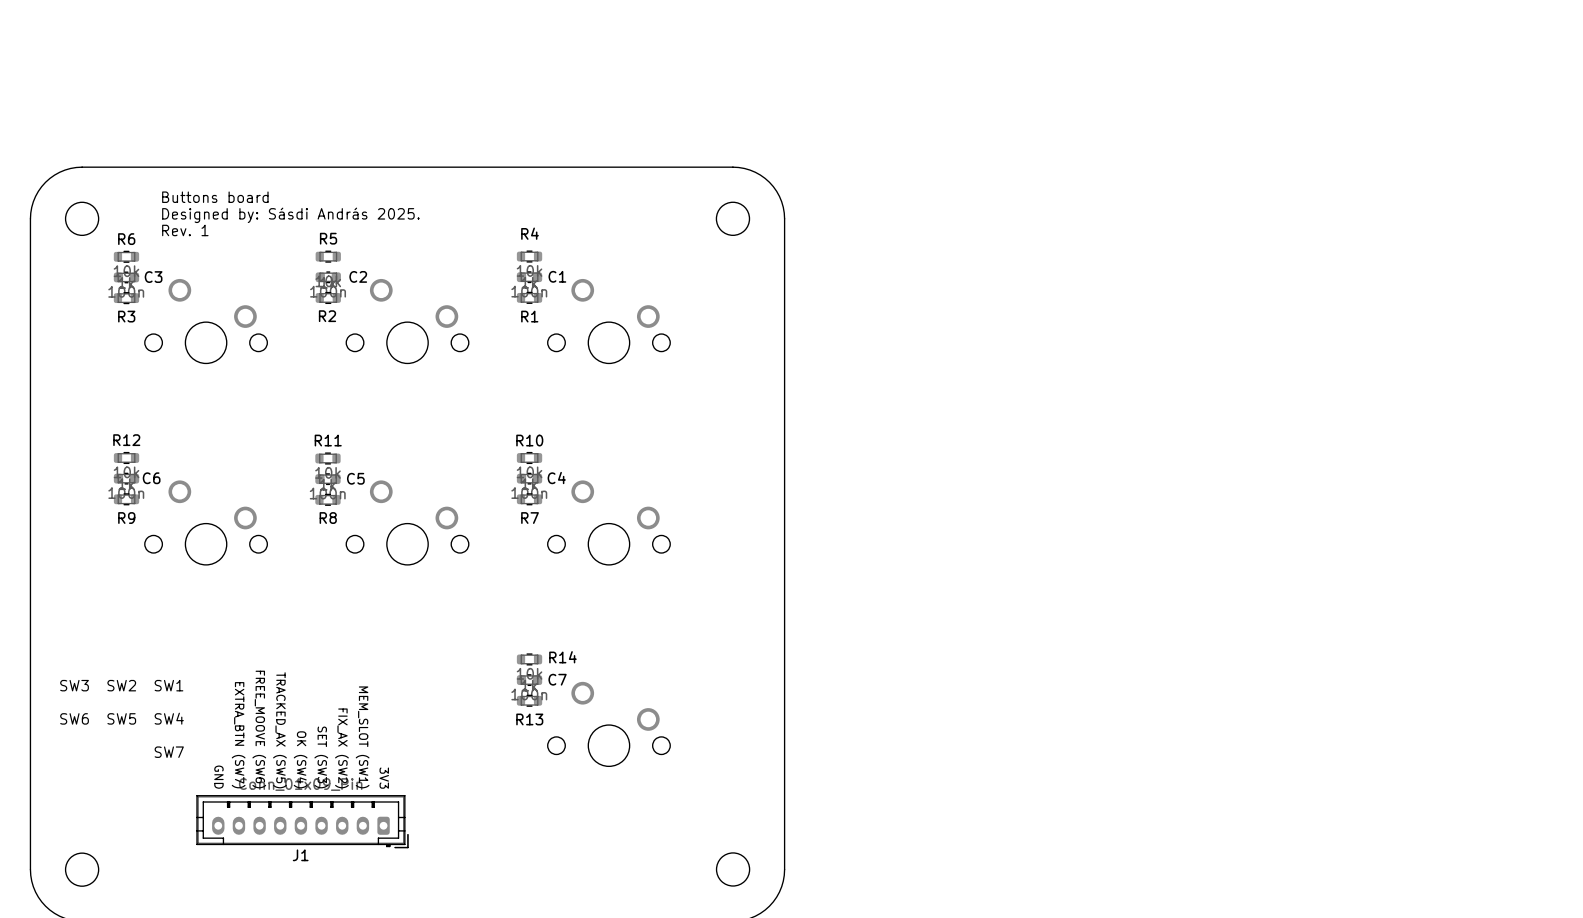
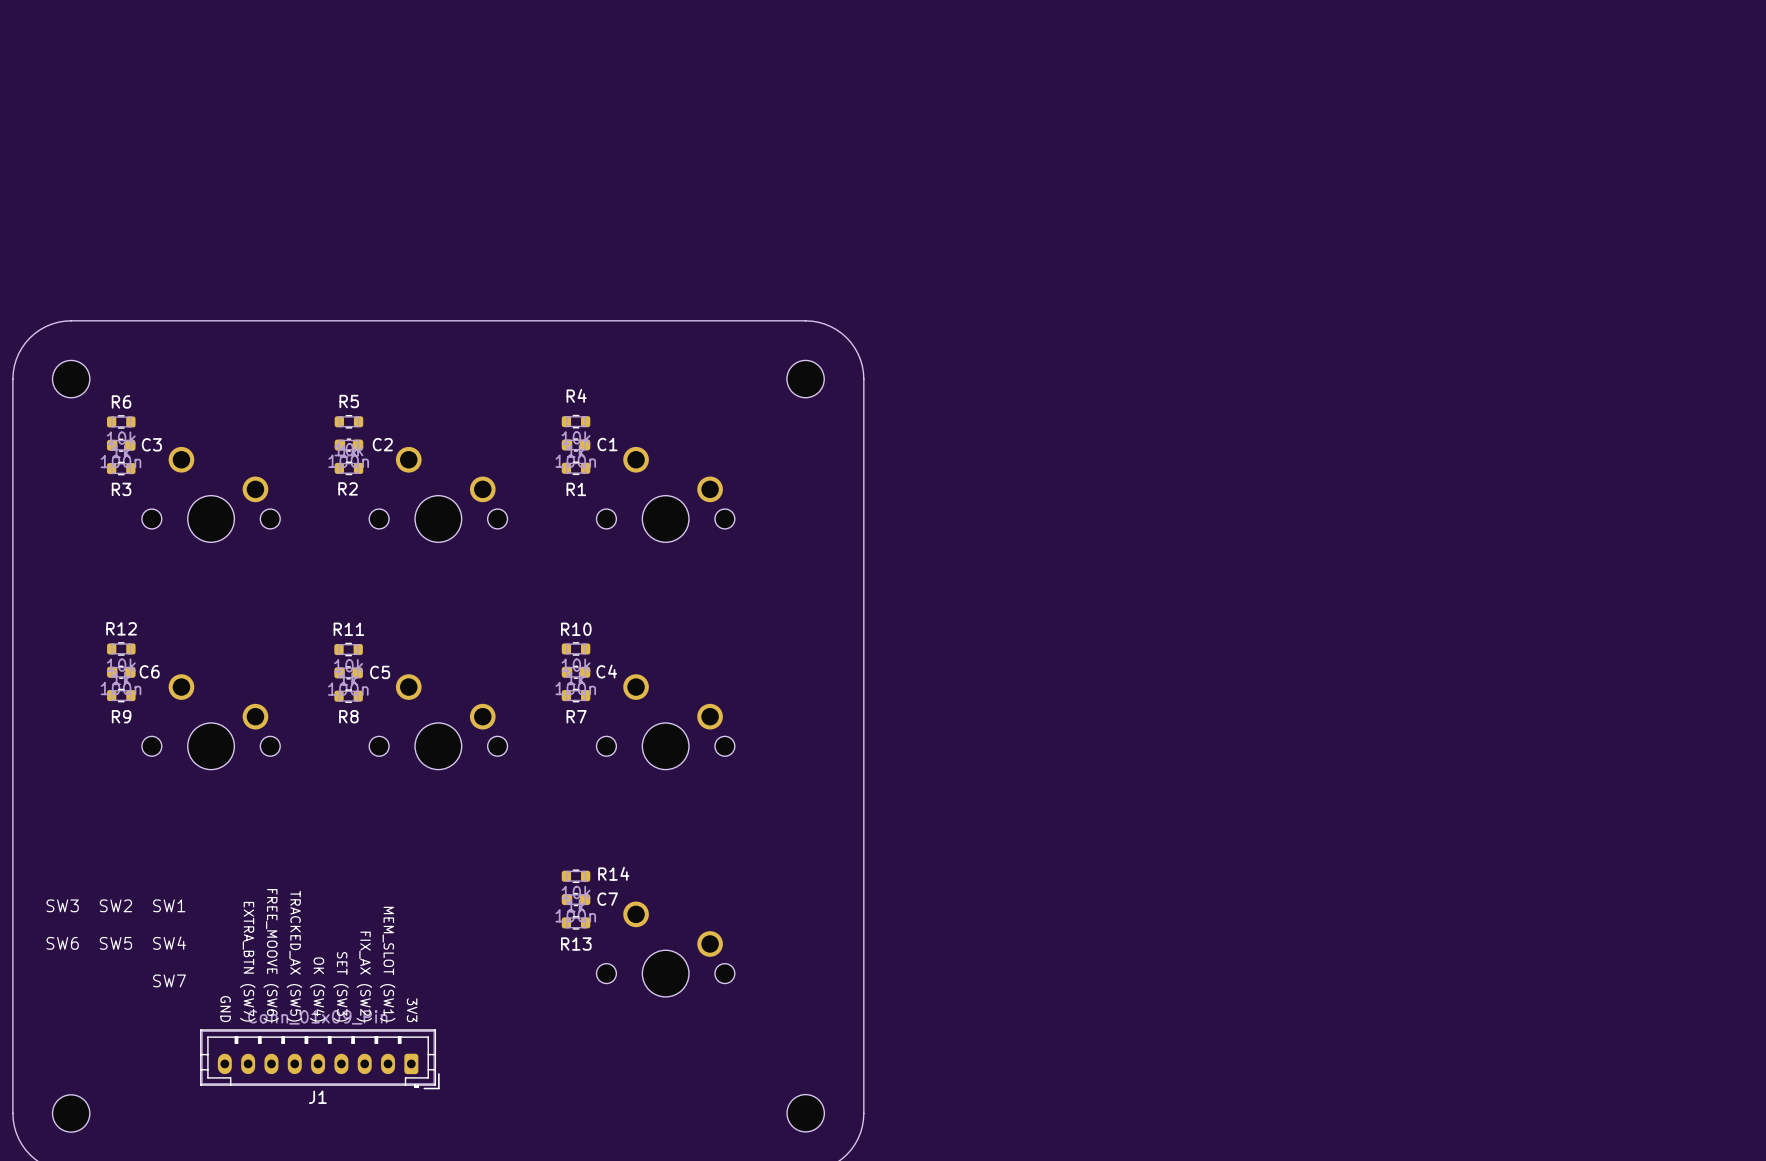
text: Buttons board (215, 197) -> none
text: Designed by: Sásdi András 2025. (290, 215) -> none
text: Rev. 1 (185, 230) -> none

